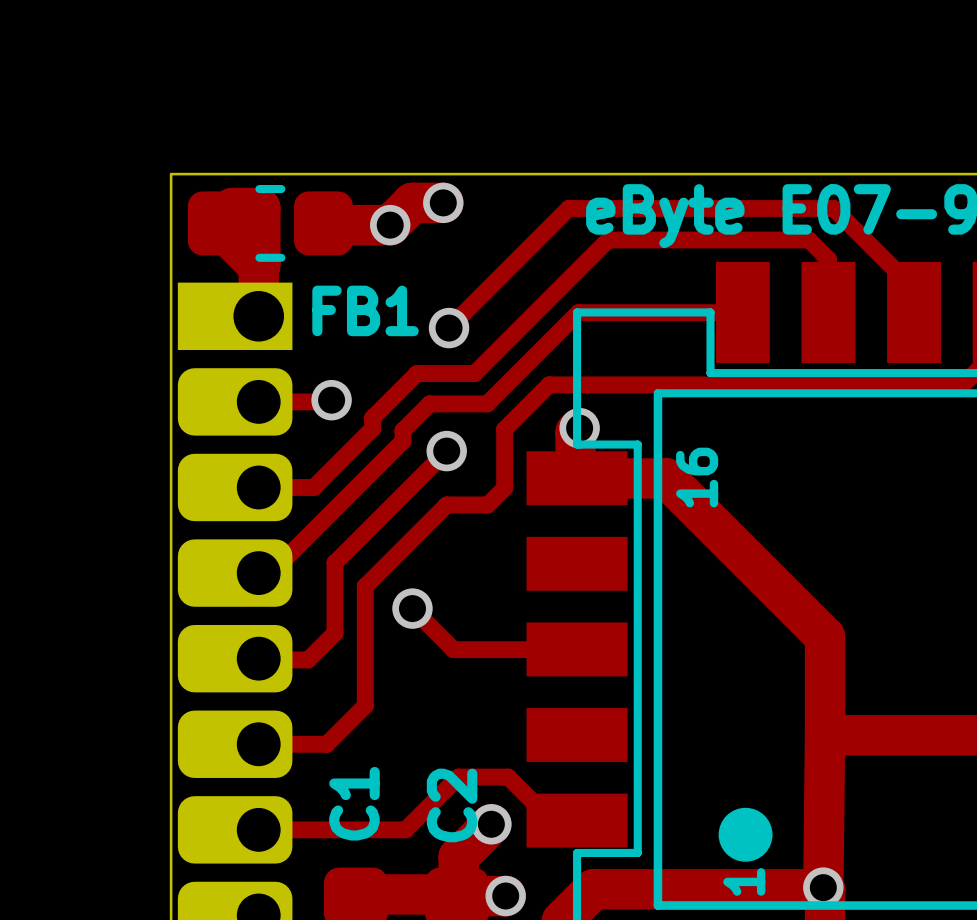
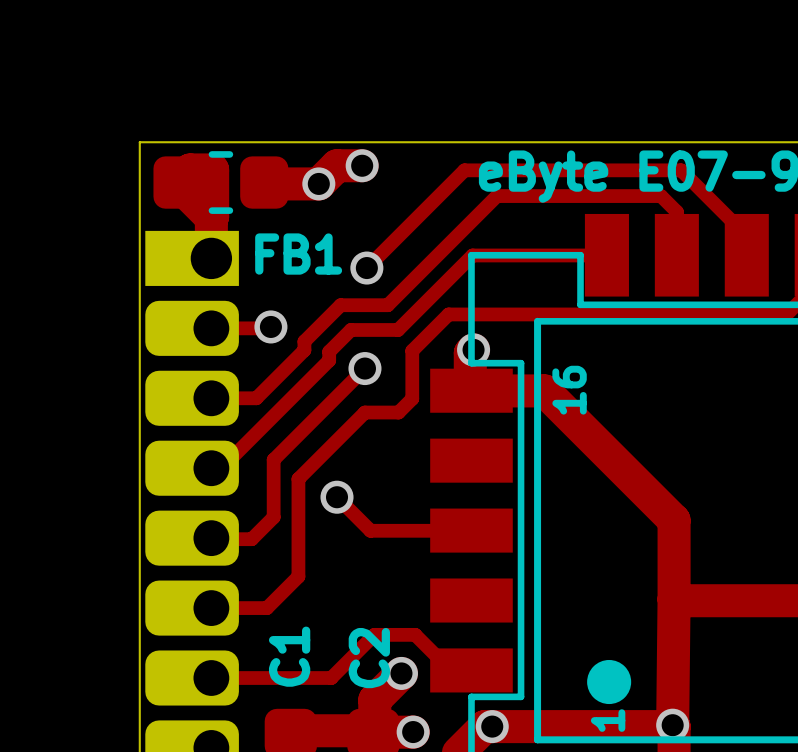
via: none -> (492, 726)

